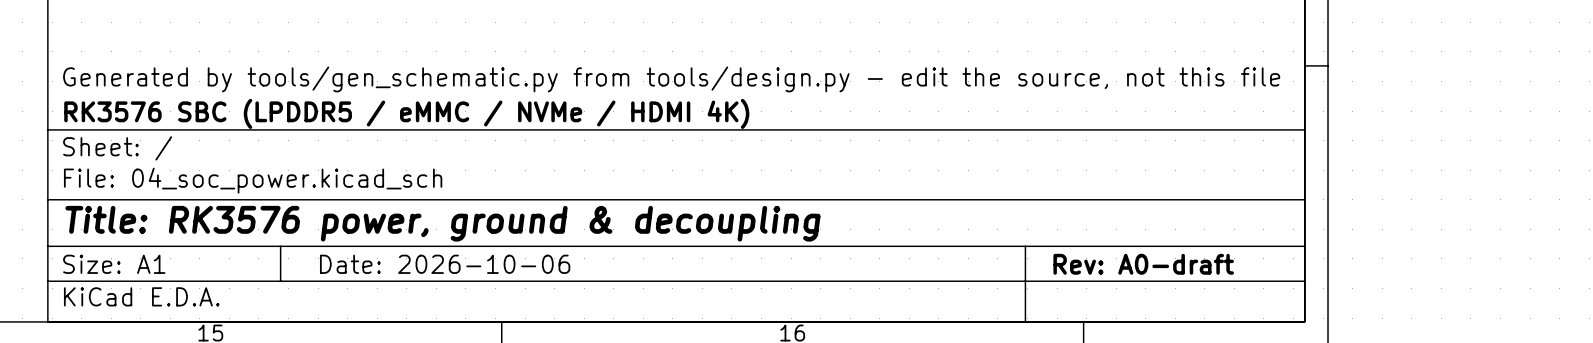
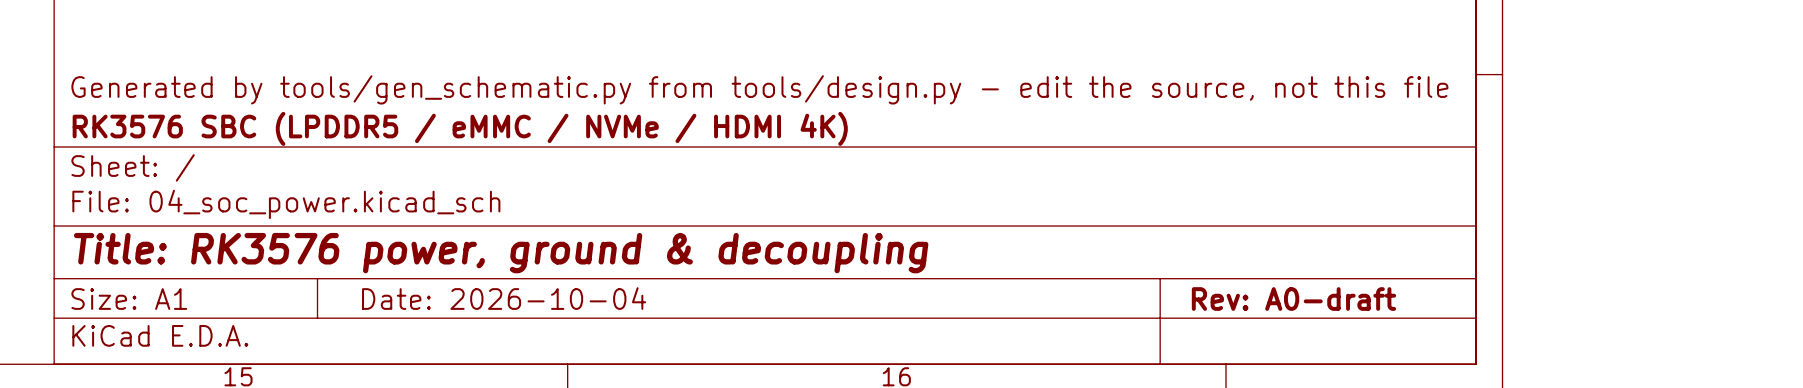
title block: Date: 2026-10-06 (445, 264) -> Date: 2026-10-04 (504, 298)

